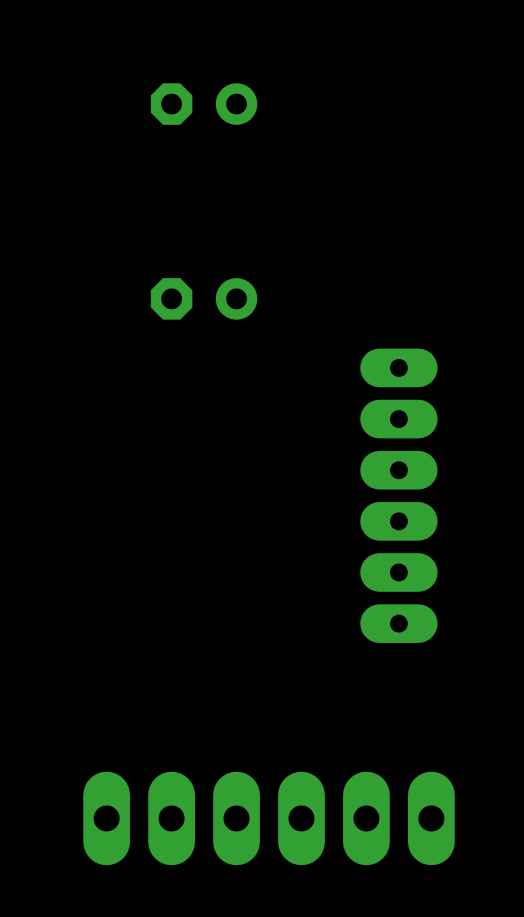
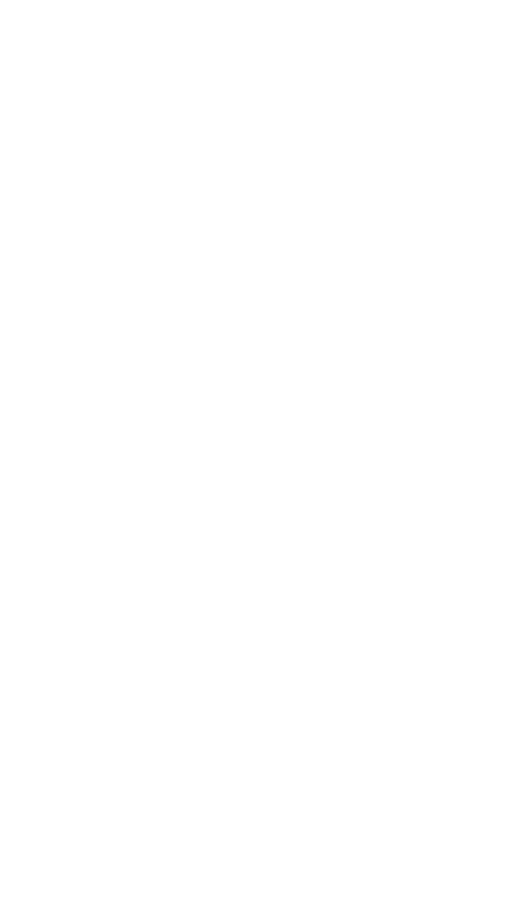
part: (204, 104) -> none
part: (204, 298) -> none
part: (398, 495) -> none
part: (269, 818) -> none

